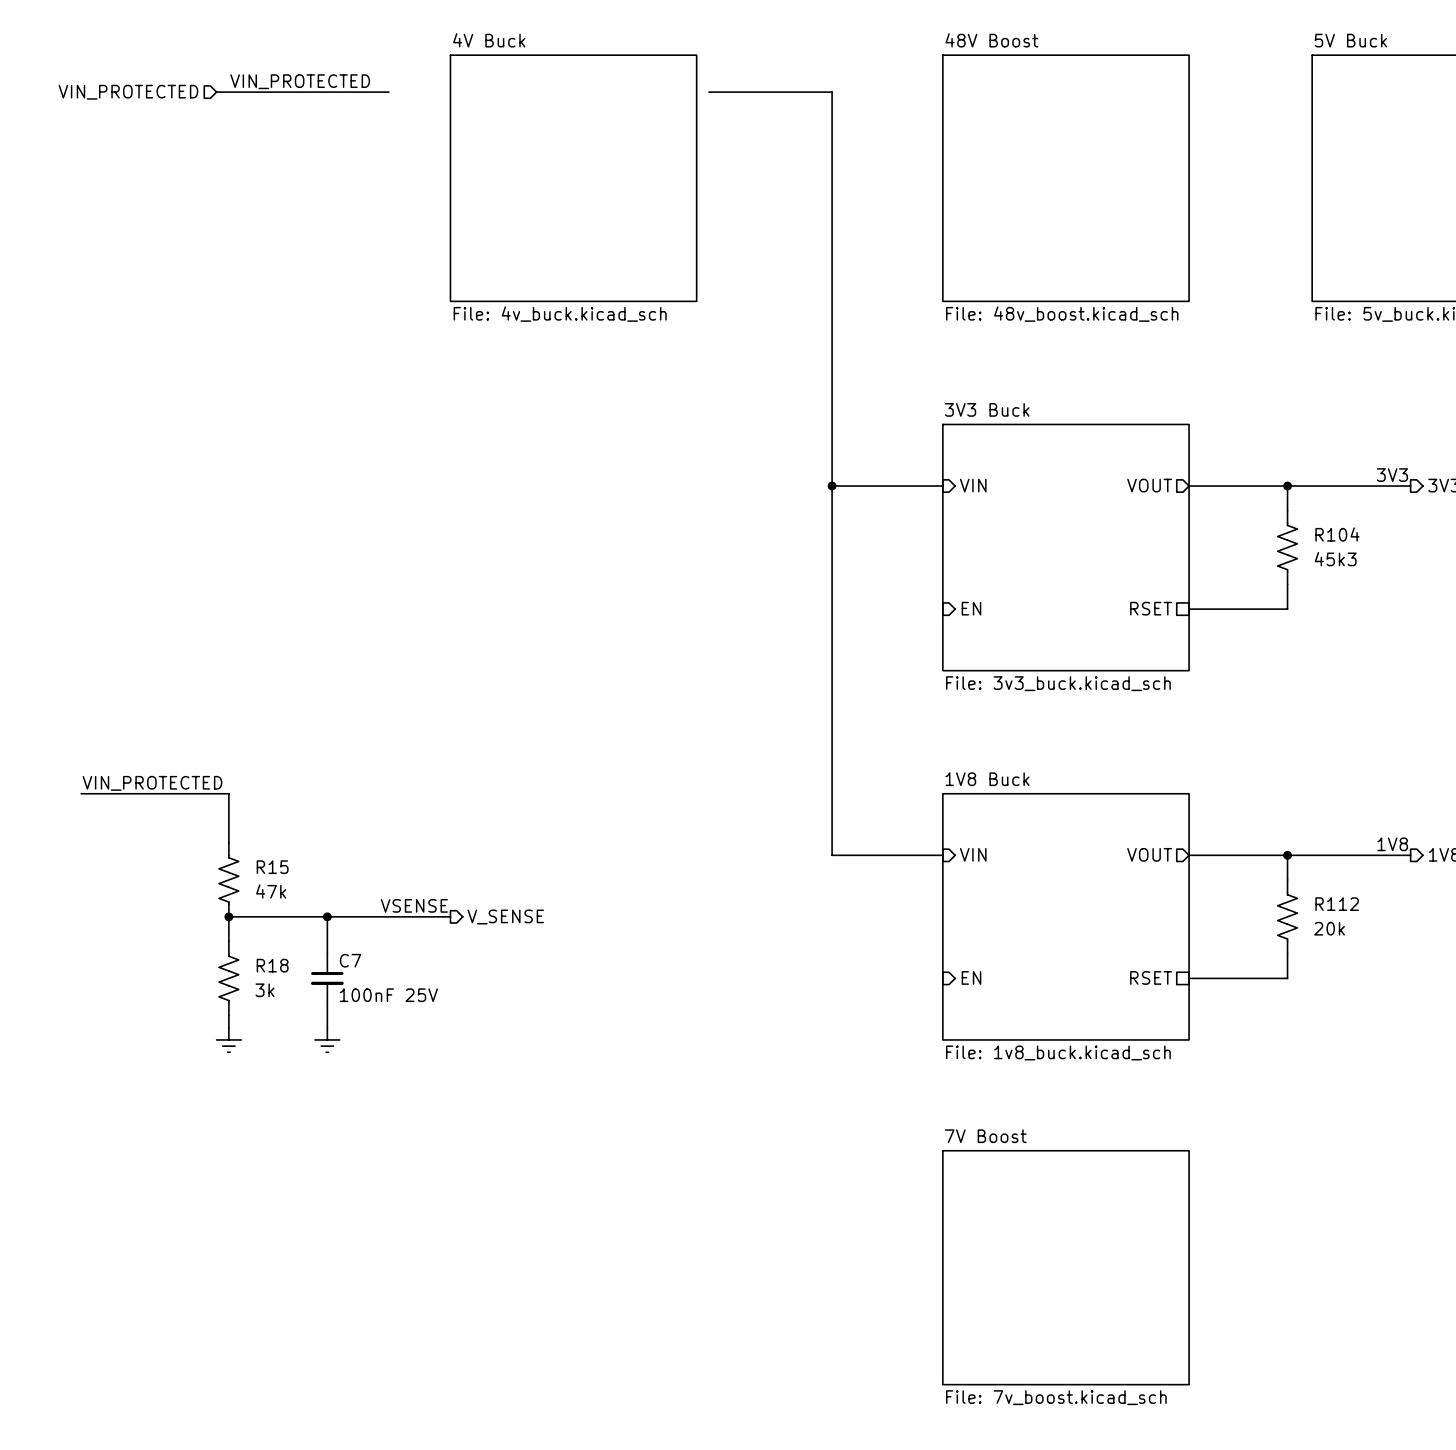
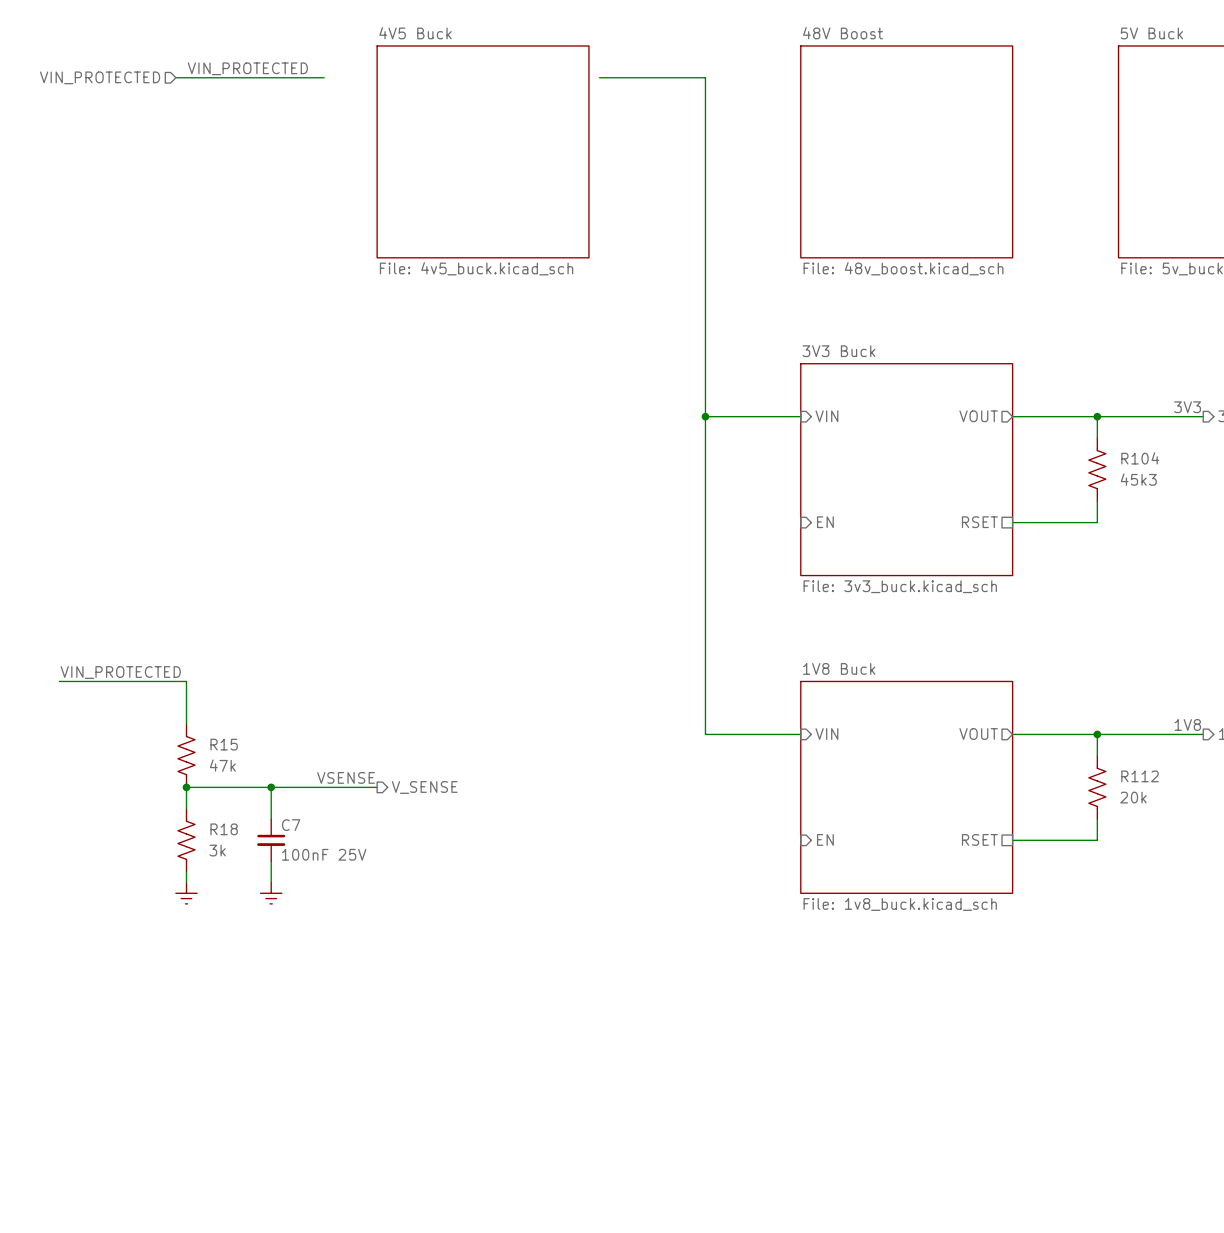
sheet 4V Buck name: 4V Buck (489, 40) -> 4V5 Buck (415, 33)
sheet 4V Buck value: File: 4v_buck.kicad_sch (560, 314) -> File: 4v5_buck.kicad_sch (476, 268)
sheet 7V Boost: File: 7v_boost.kicad_sch (1065, 1267) -> none

